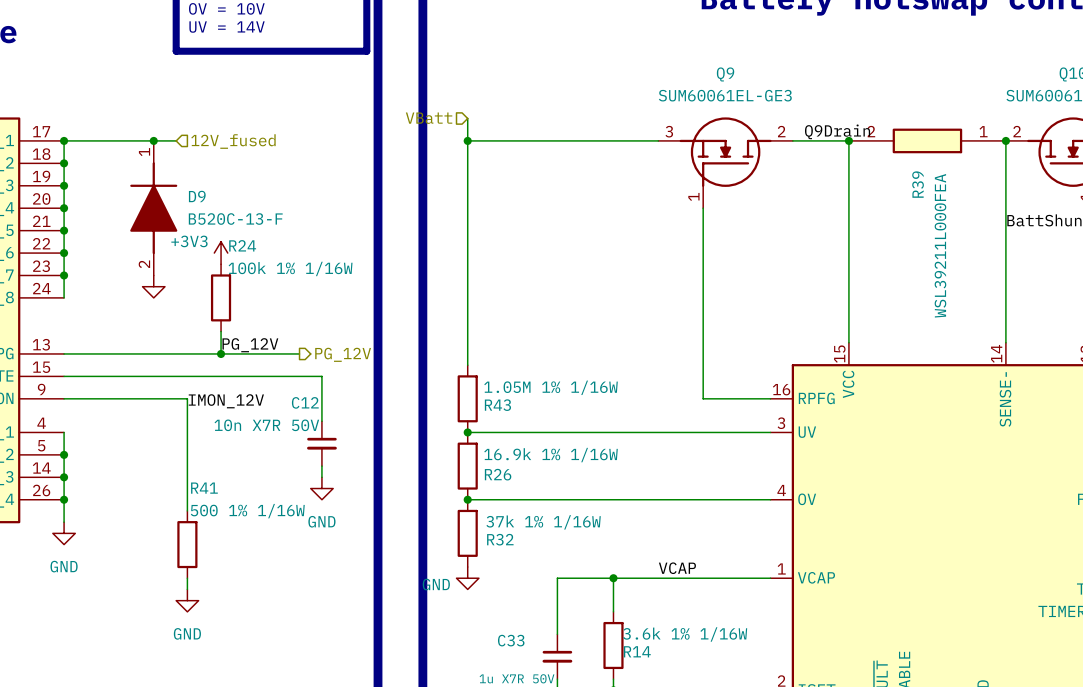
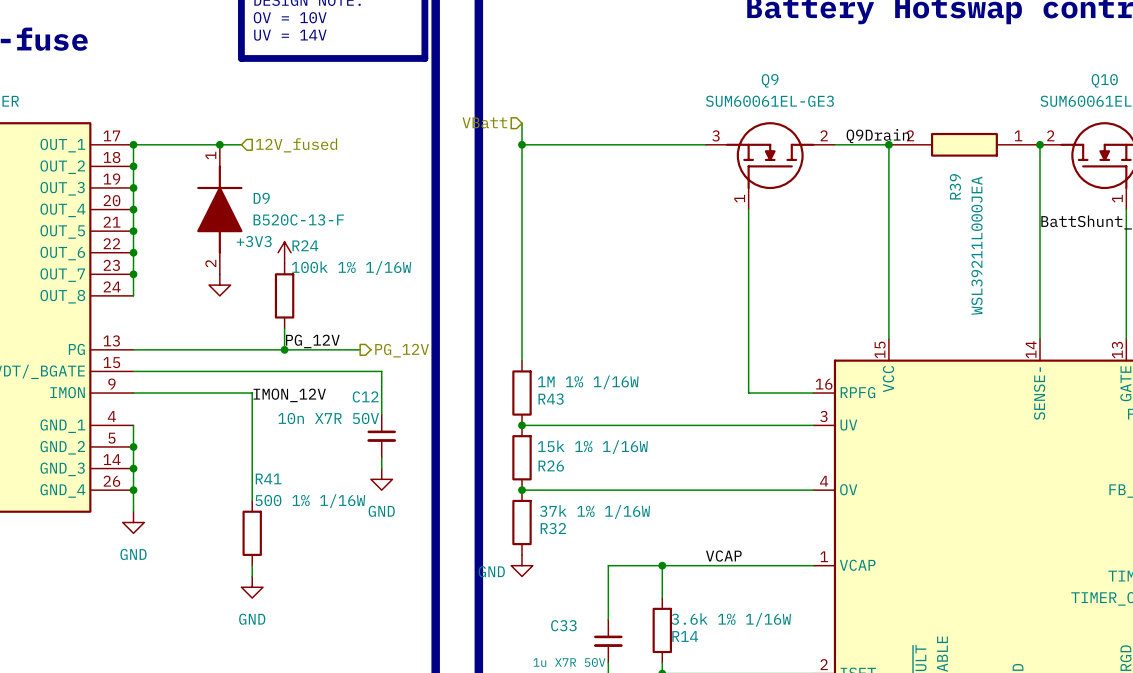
R39 value: WSL39211L000FEA (940, 245) -> WSL39211L000JEA (977, 245)
R43 value: 1.05M 1% 1/16W (551, 387) -> 1M 1% 1/16W (588, 382)
R26 value: 16.9k 1% 1/16W (551, 455) -> 15k 1% 1/16W (592, 447)

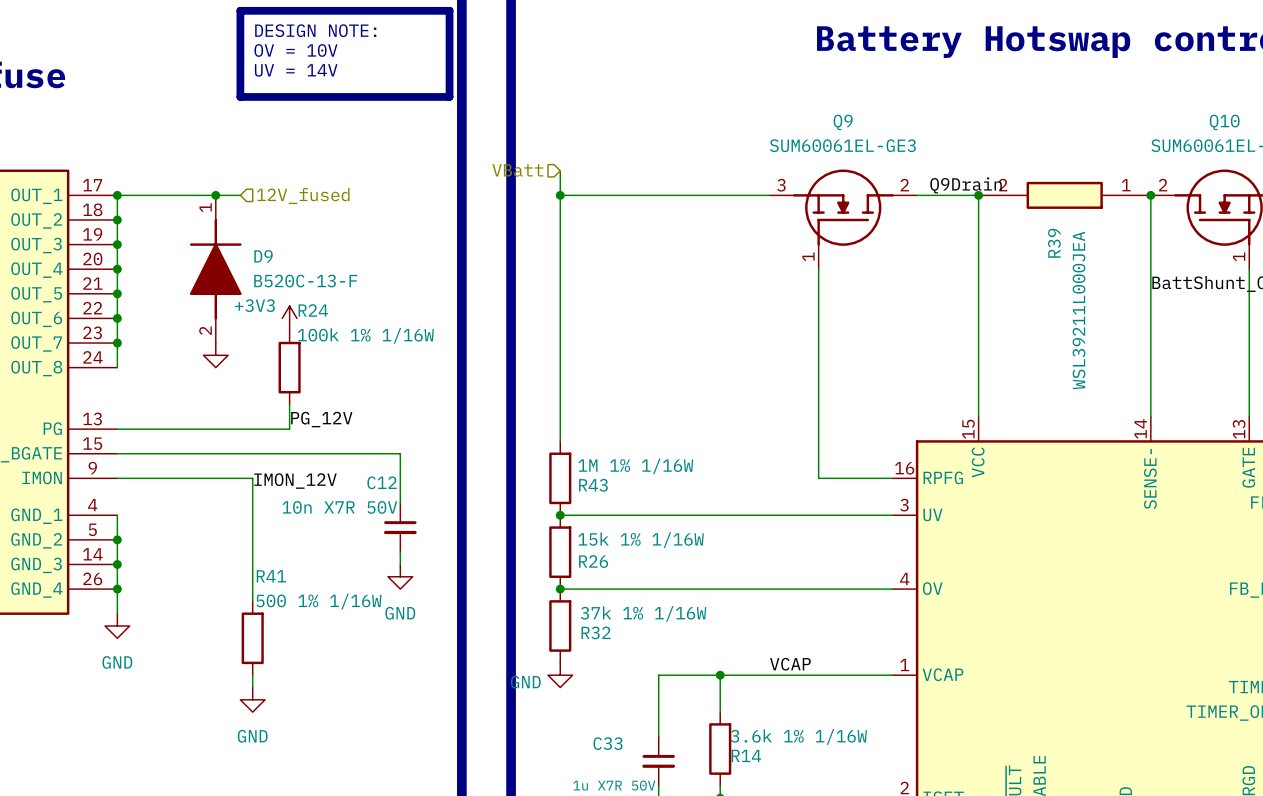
wire: (284, 349) (360, 349) -> none
junction: (284, 349) -> none
hierarchical label: PG_12V (402, 350) -> none

